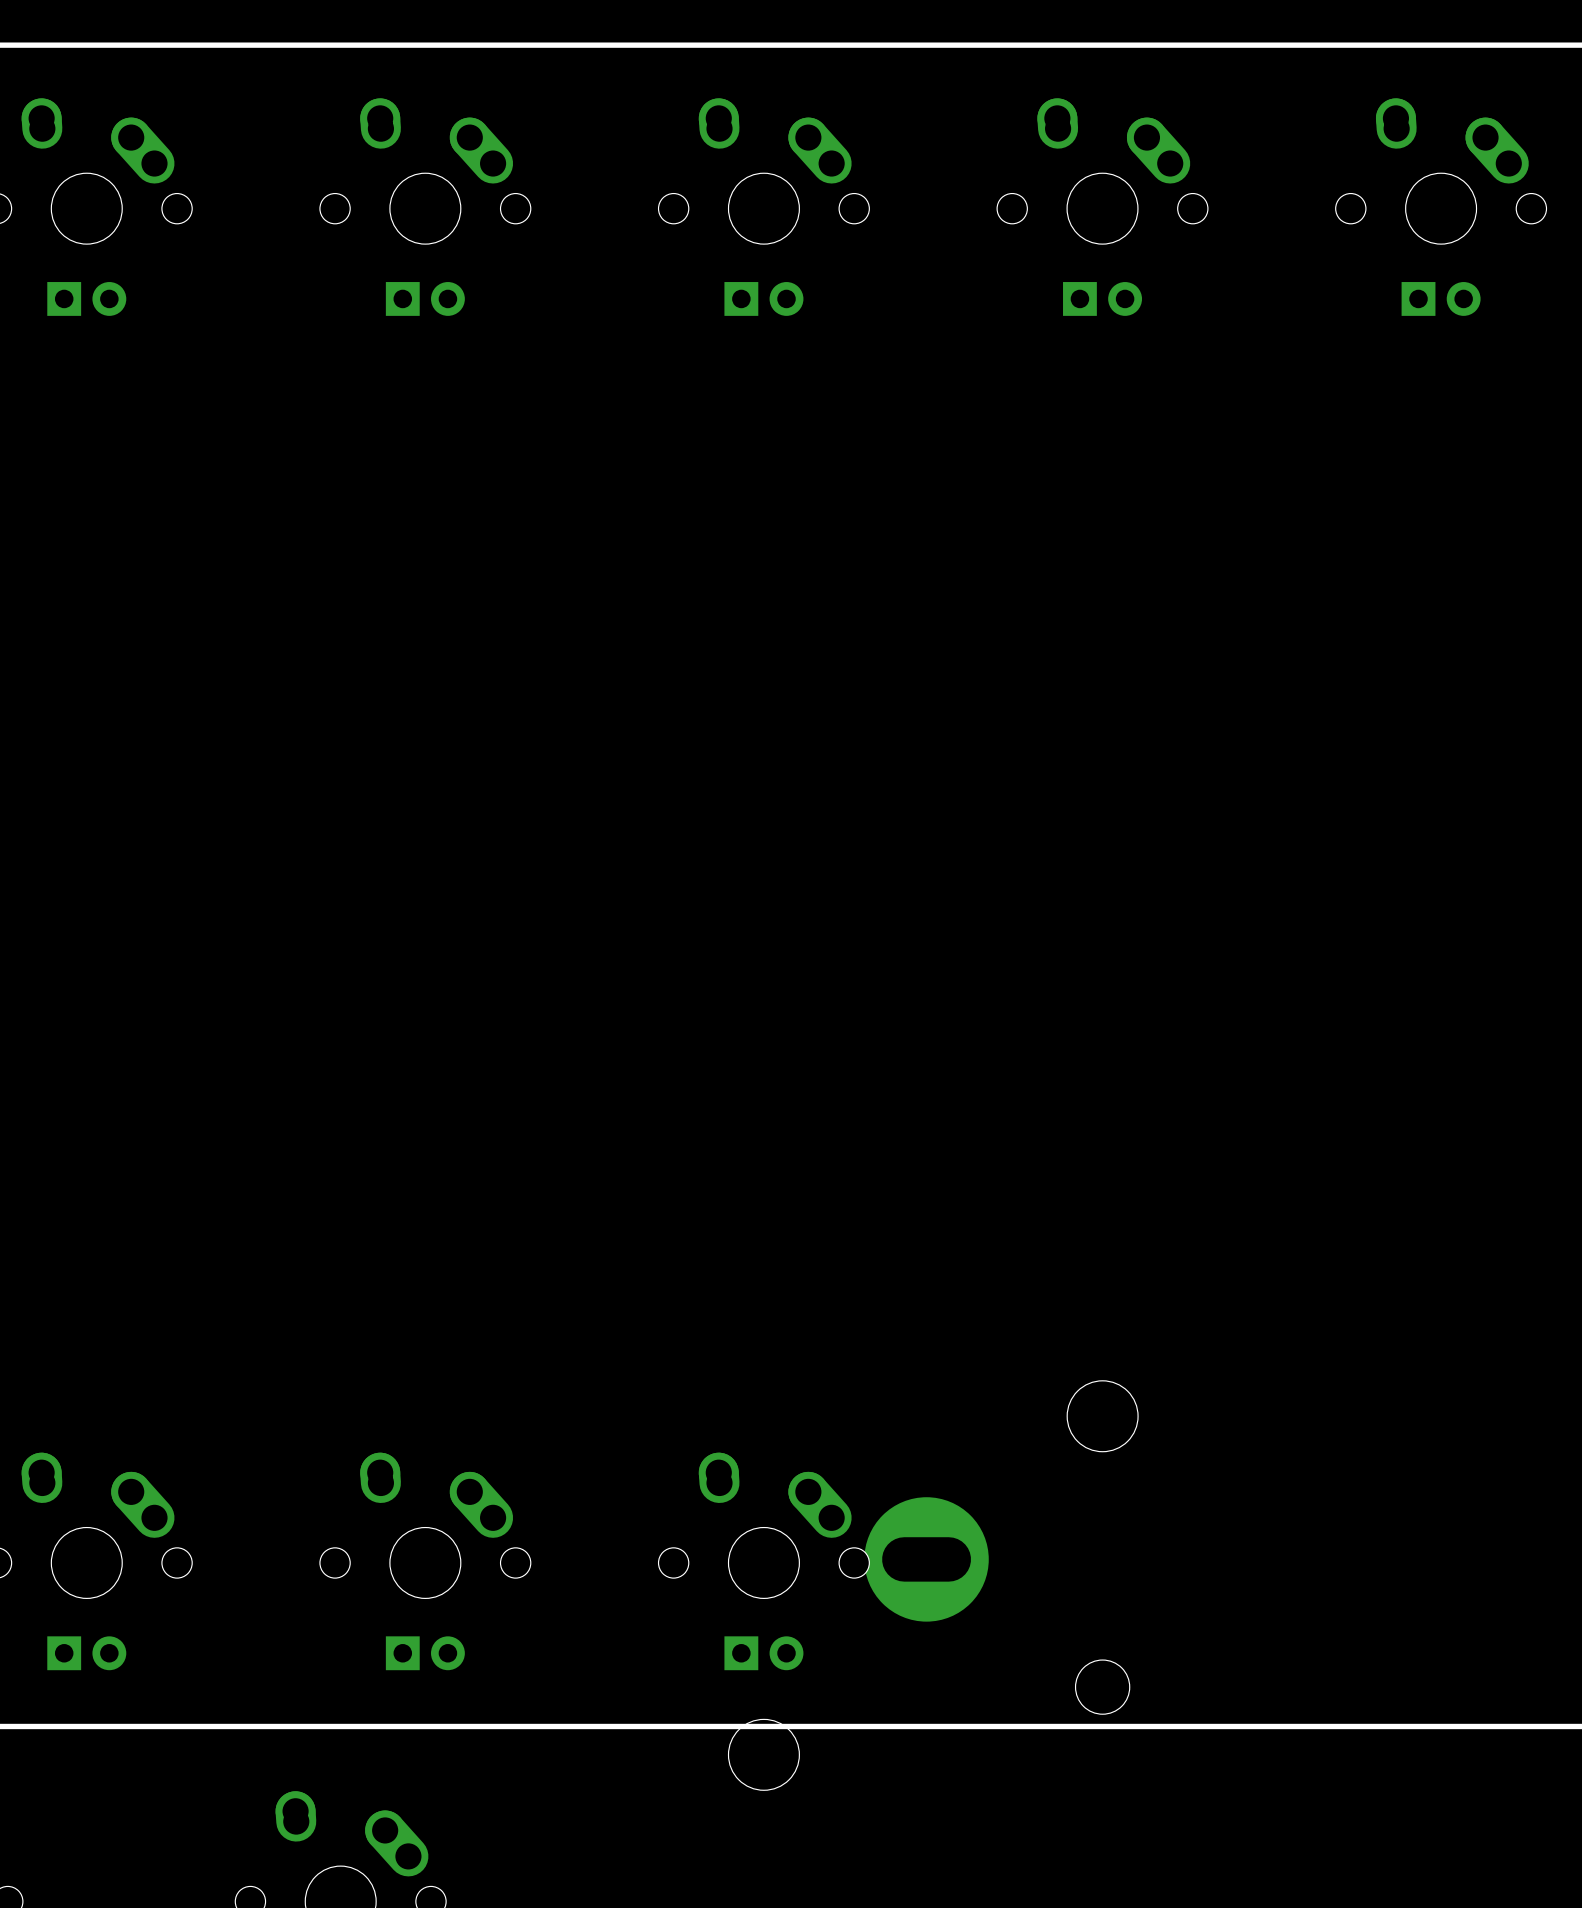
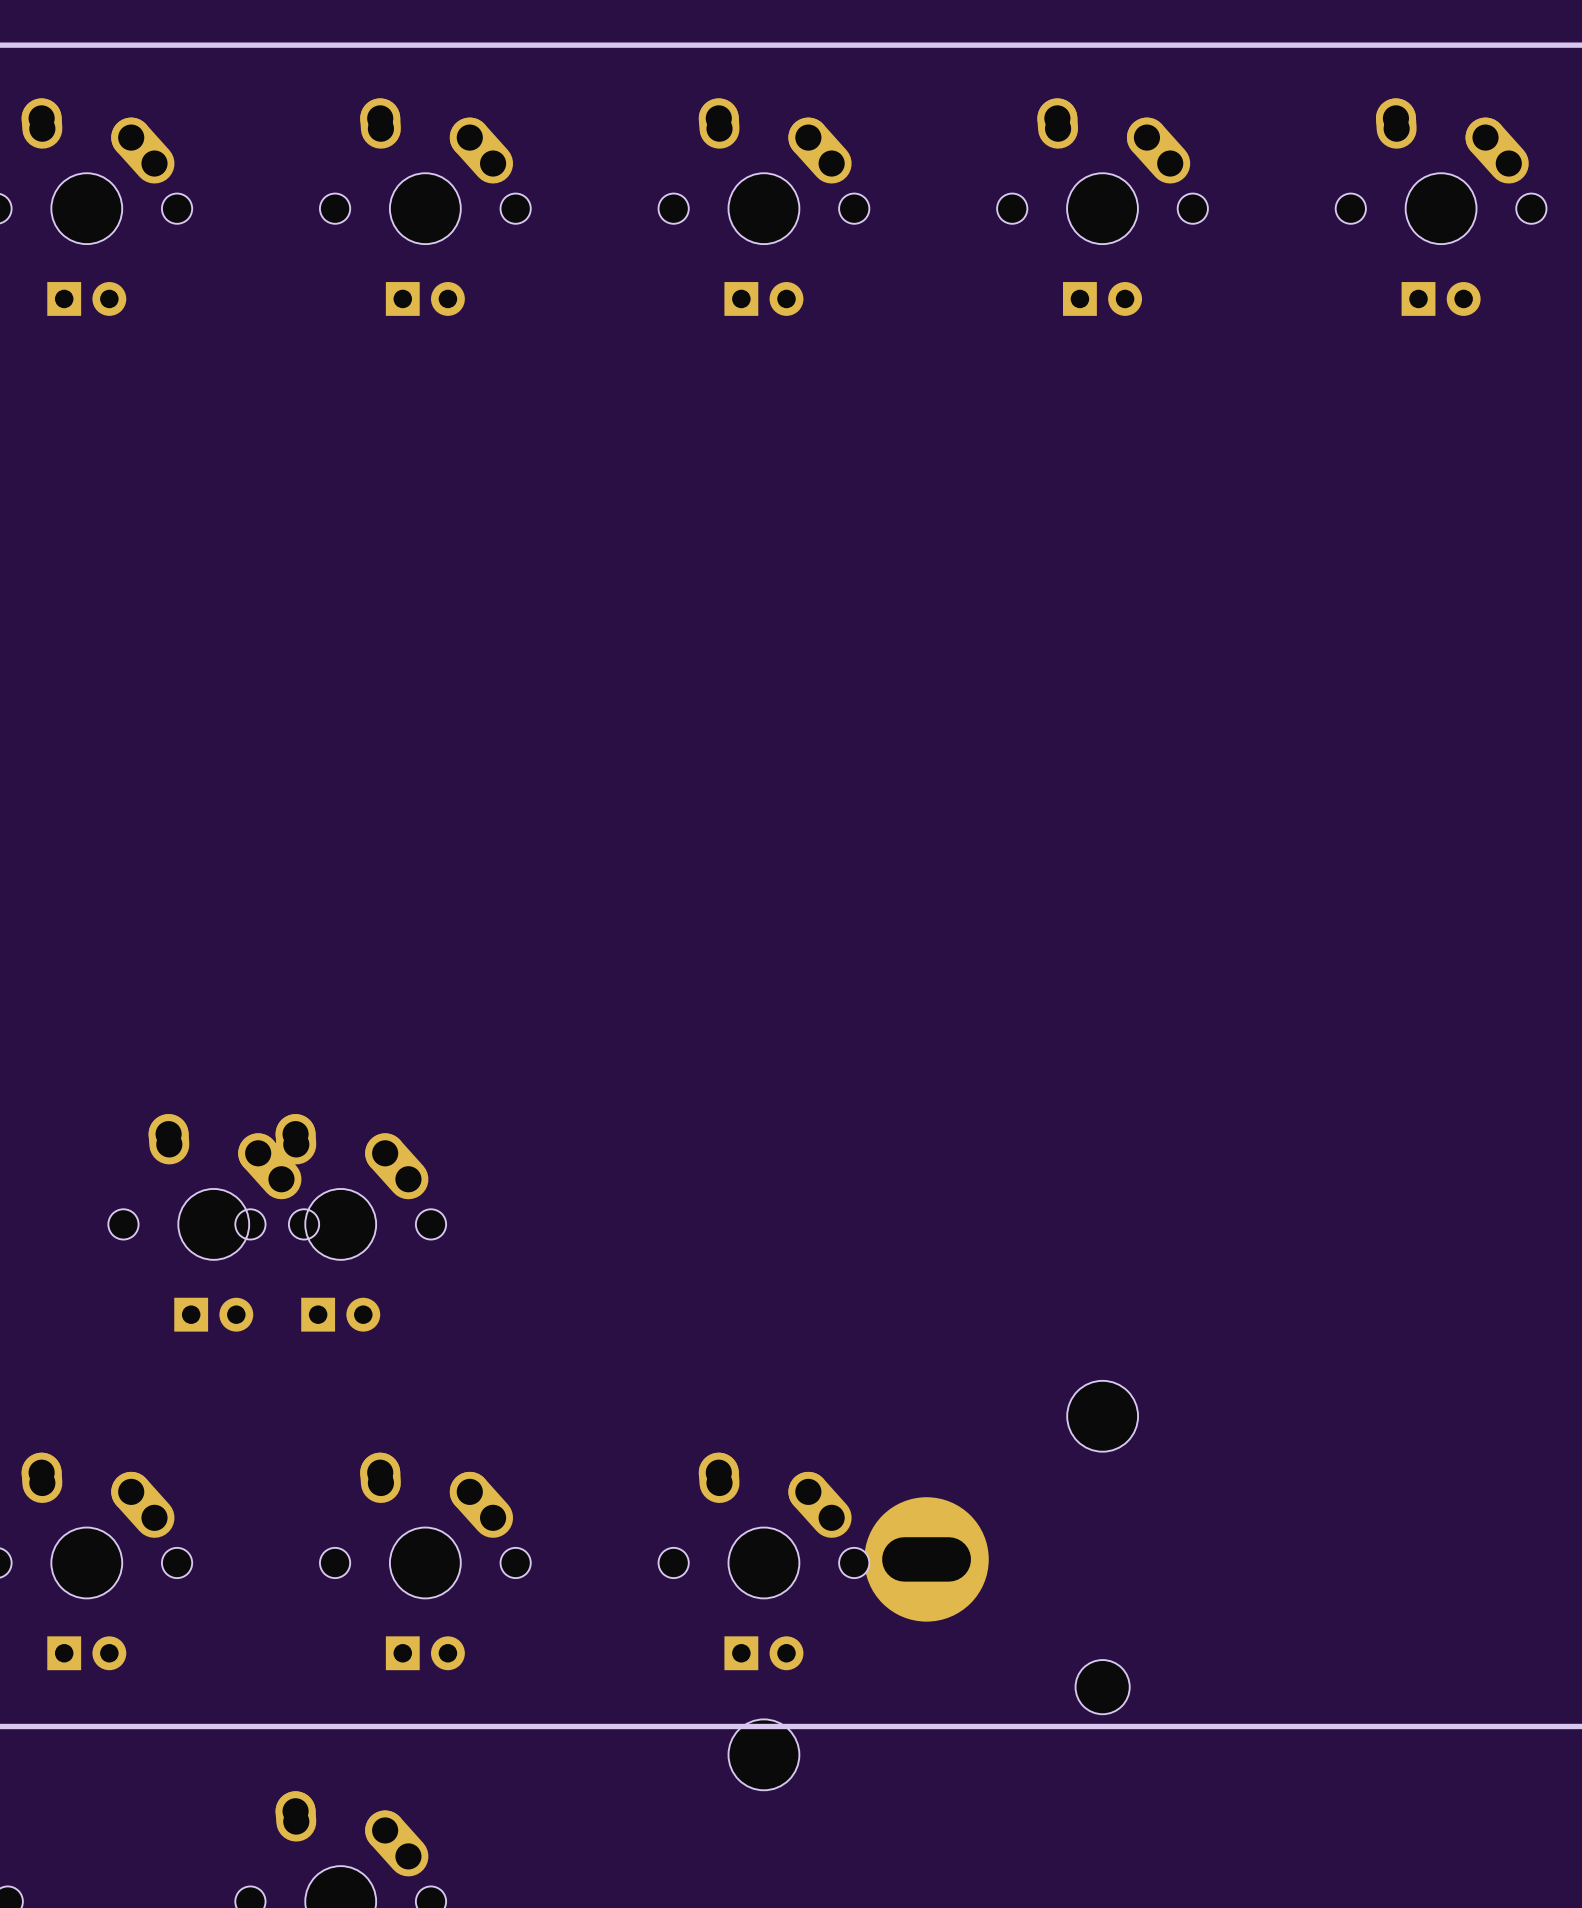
part: none -> (213, 1222)
part: none -> (340, 1222)

